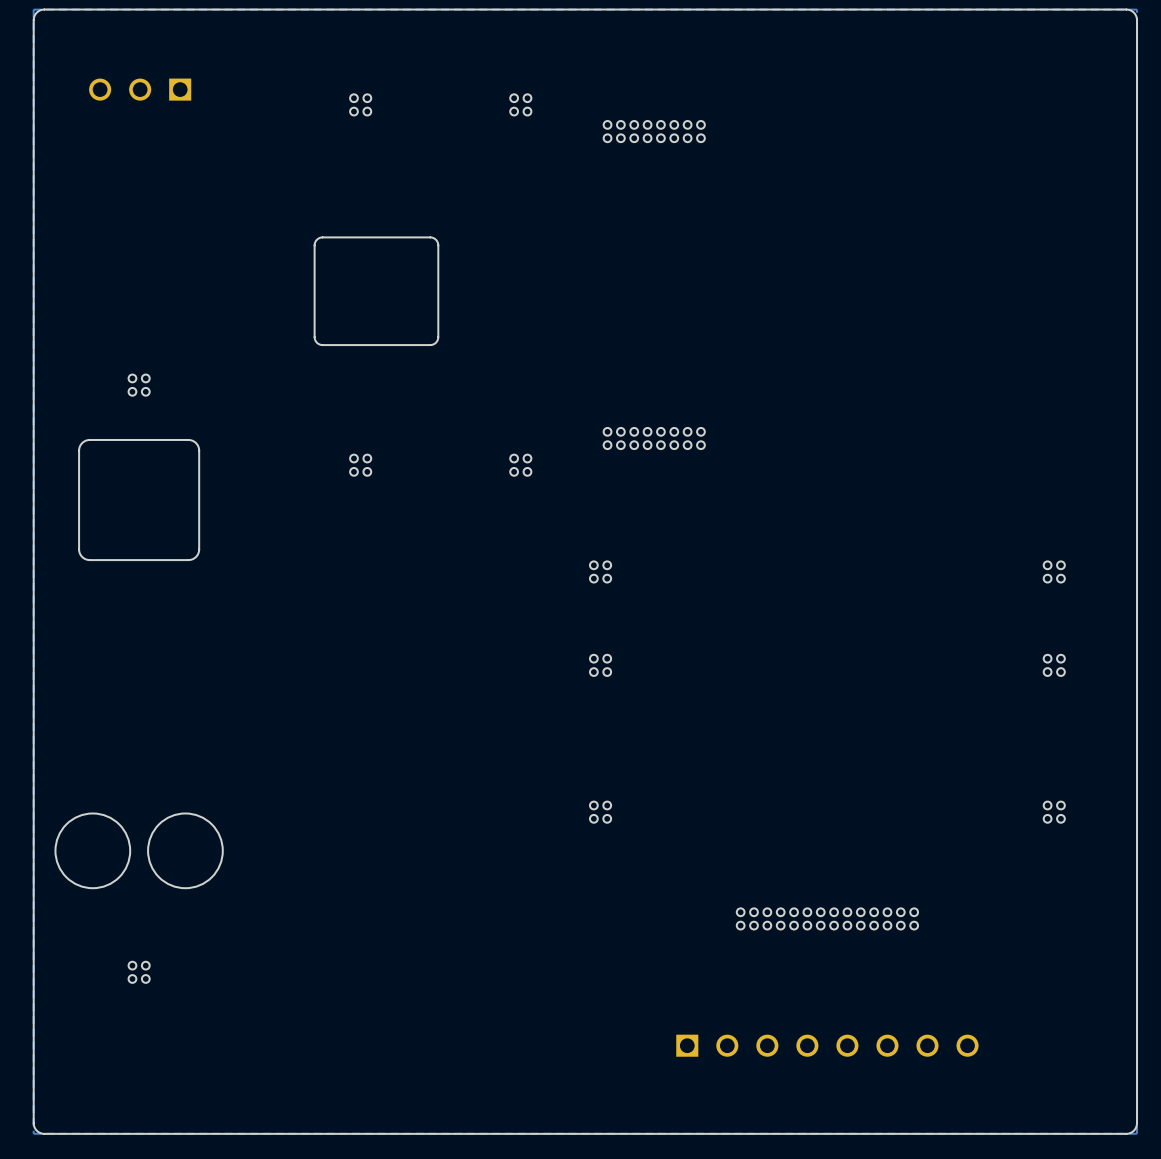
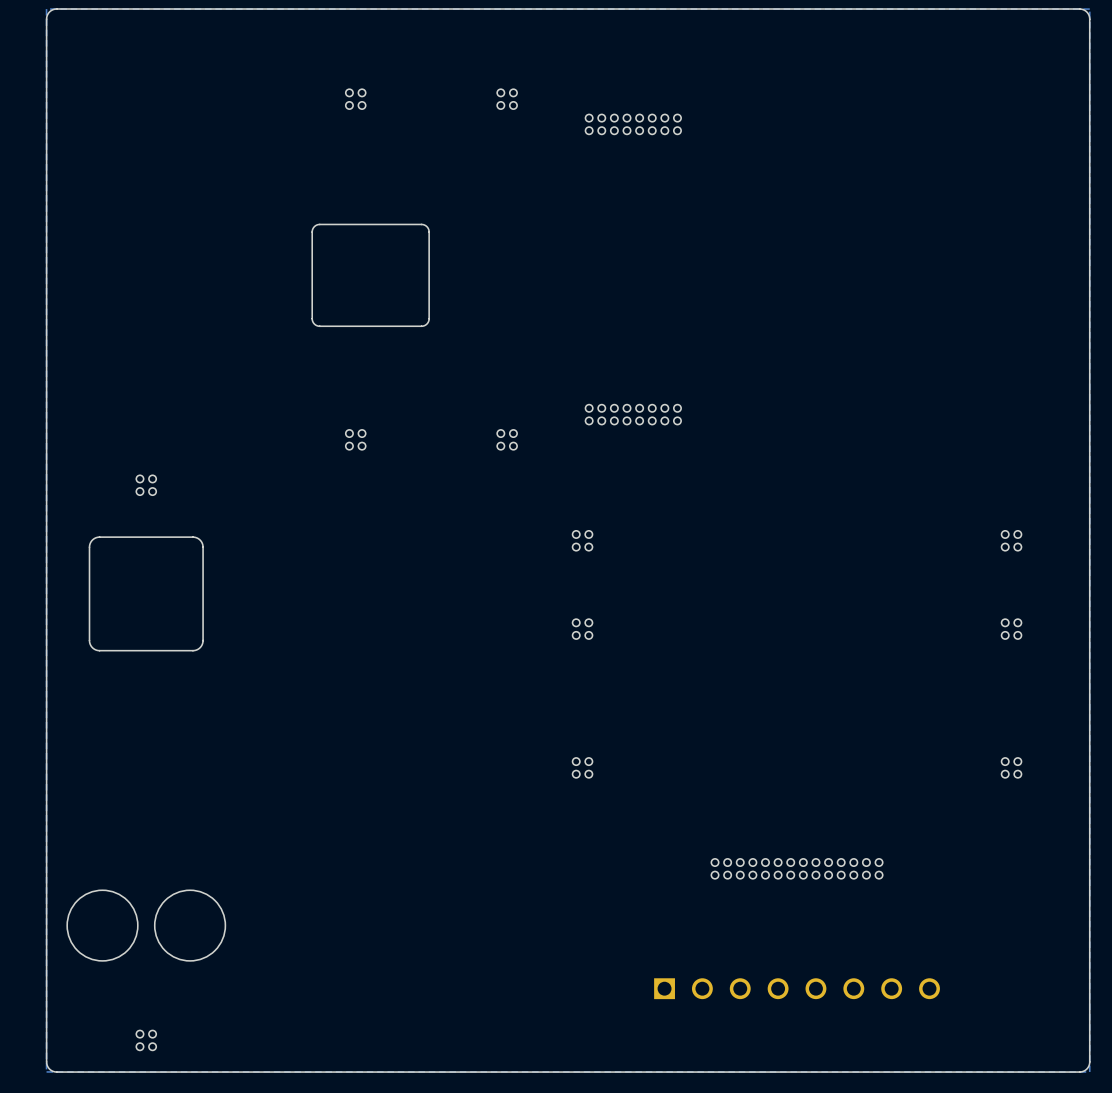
part: (140, 89) -> none
part position: (139, 385) -> (146, 485)
drawing position: (139, 664) -> (146, 749)
part position: (139, 972) -> (146, 1040)

